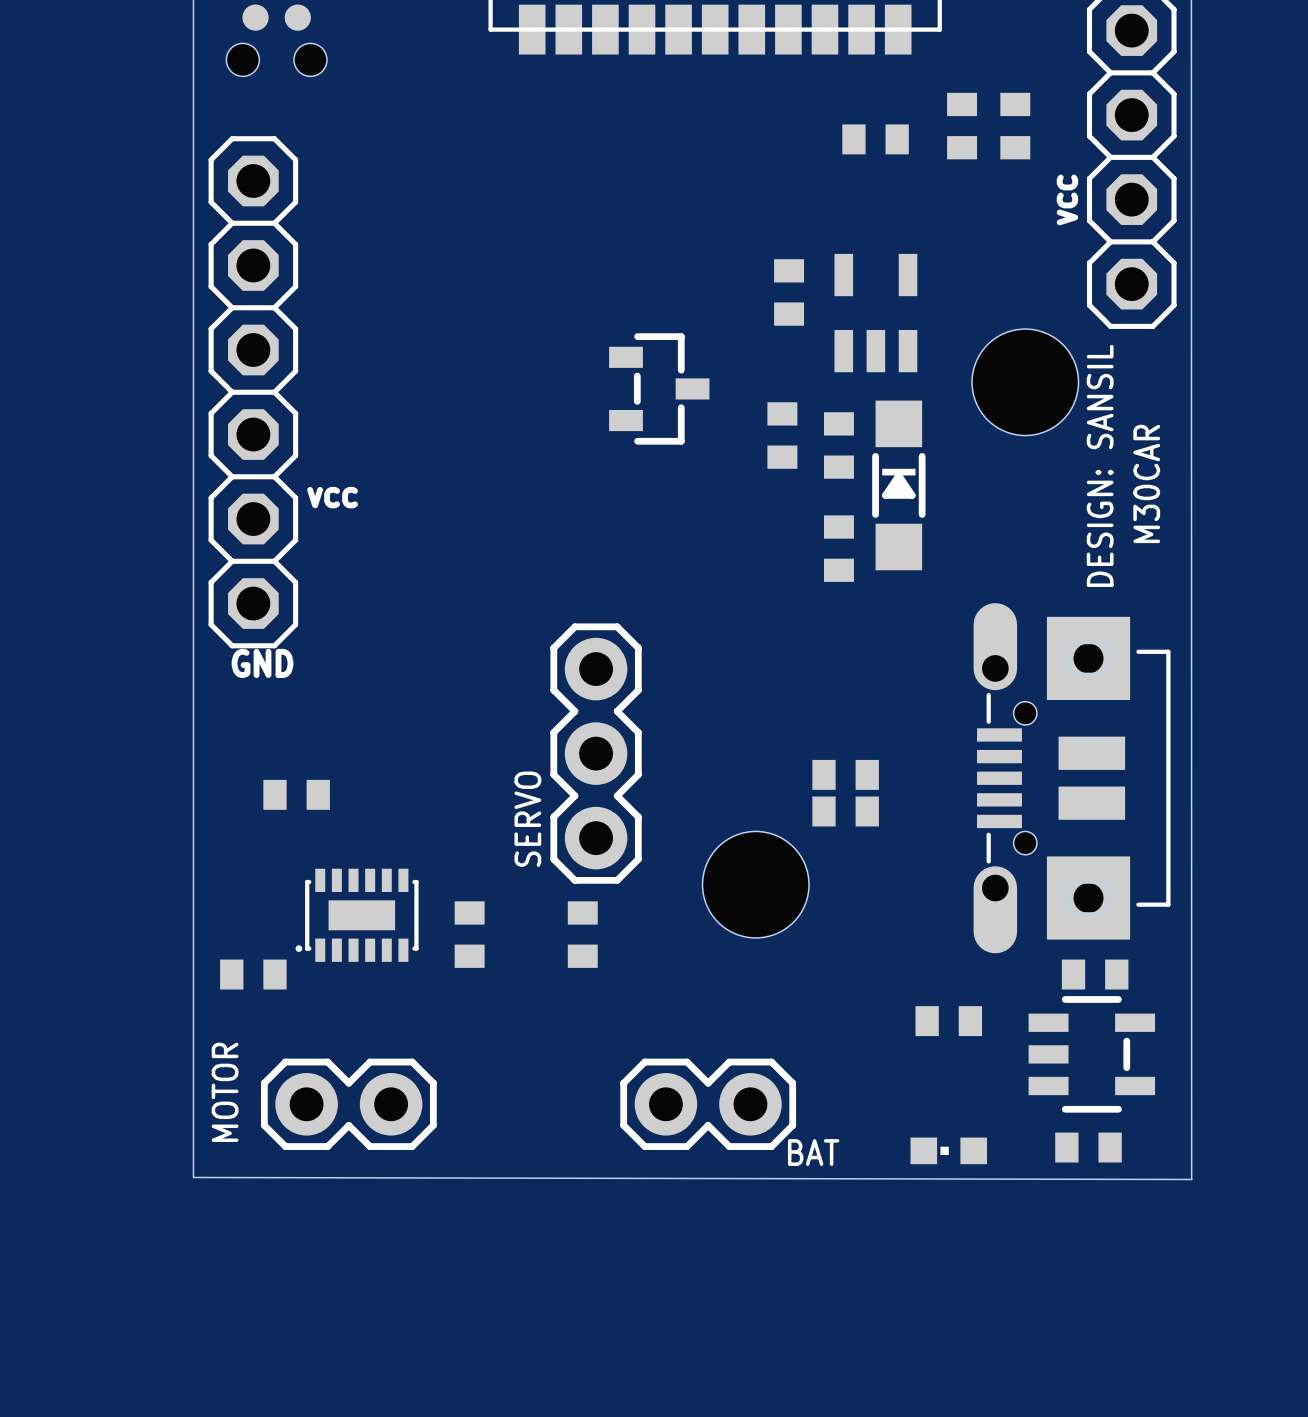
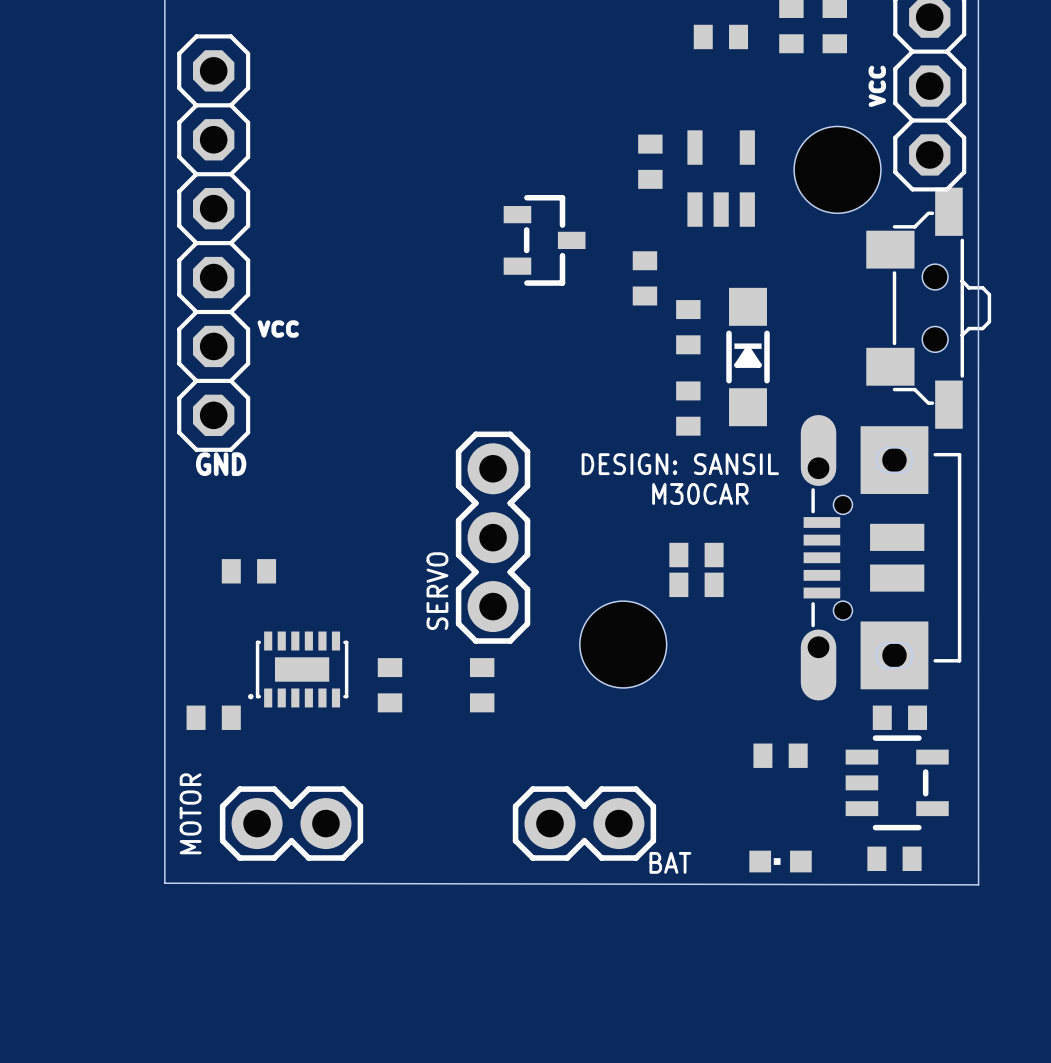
hole position: (1025, 382) -> (837, 169)
part: (838, 445) -> none
text rotation: 0° (1100, 465) -> 90° clockwise (680, 464)
text position: DESIGN: SANSIL (1100, 465) -> DESIGN: SANSIL (680, 464)
part: none -> (928, 308)
text rotation: 0° (1146, 483) -> 90° clockwise (700, 494)
text position: M30CAR (1146, 483) -> M30CAR (700, 494)
part position: (898, 485) -> (748, 357)
part: none -> (688, 327)
part: (838, 548) -> none
part: none -> (688, 408)

